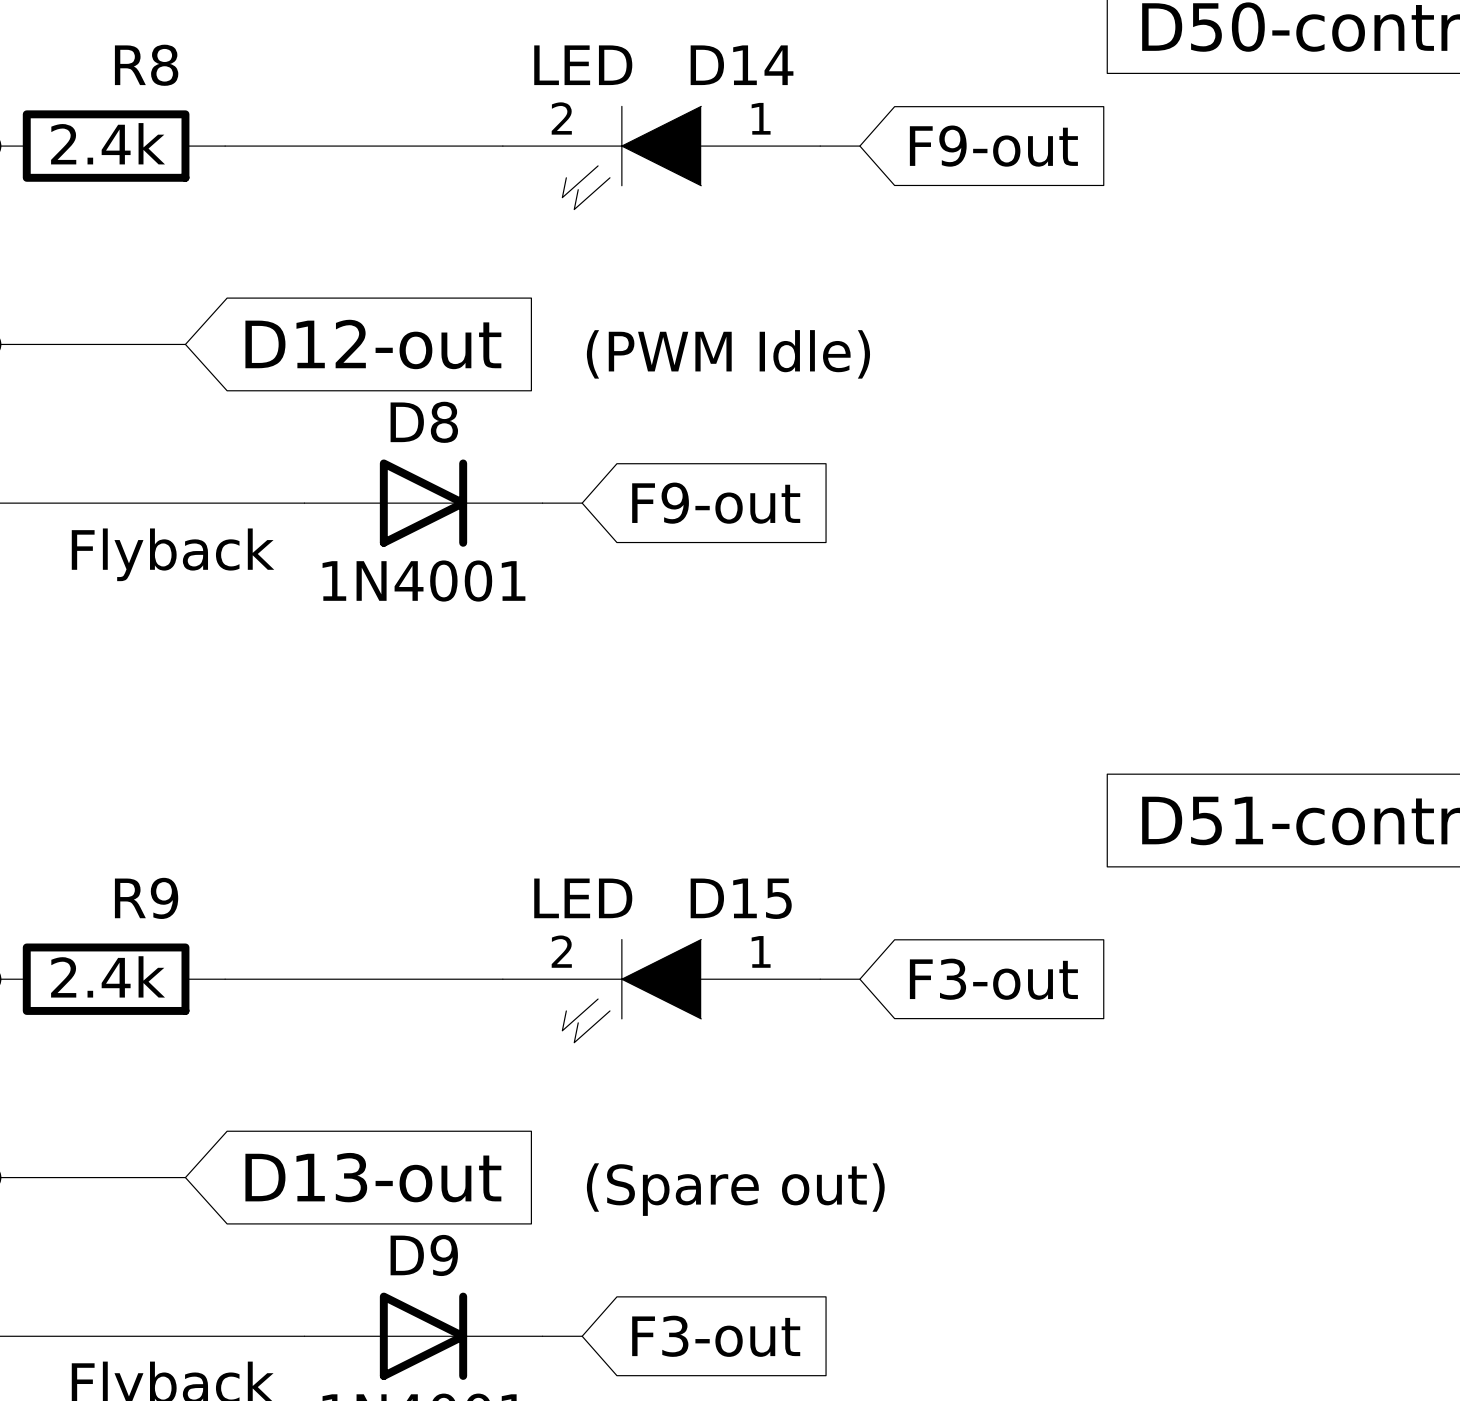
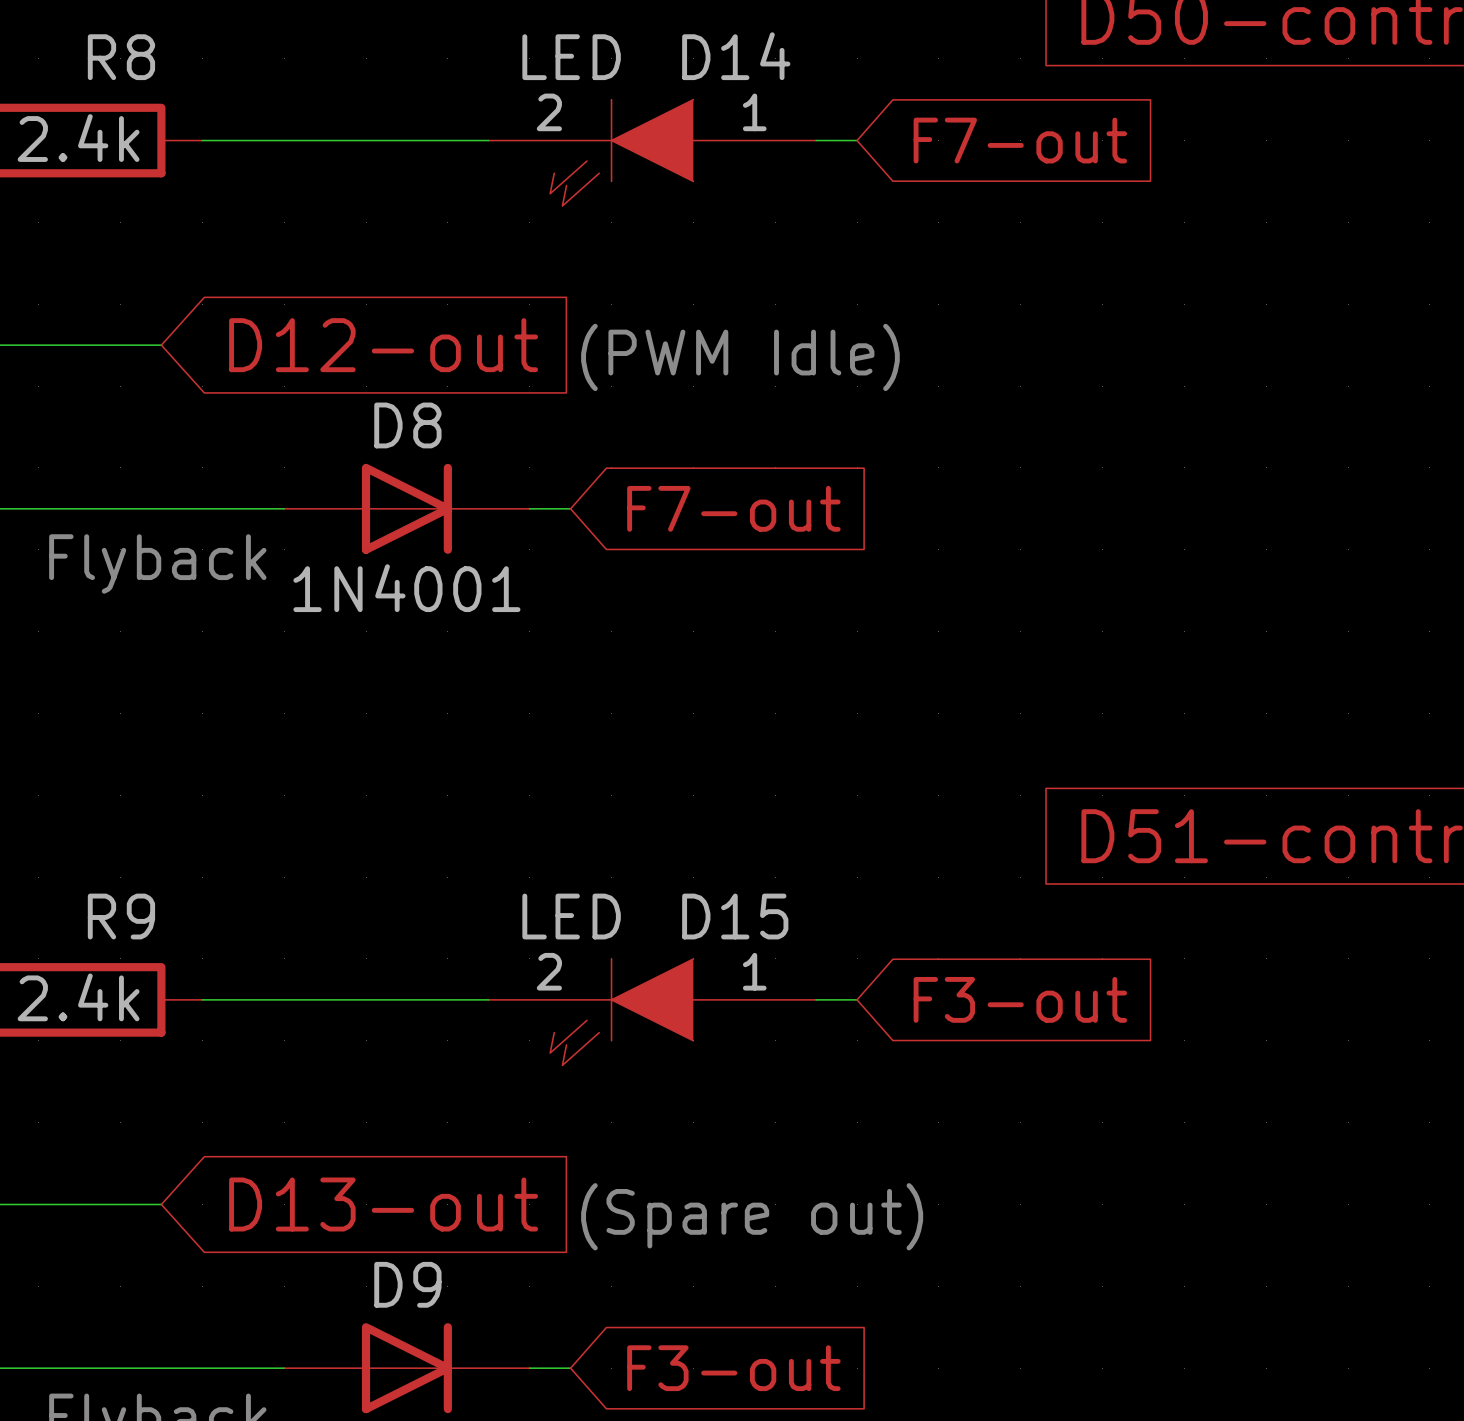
global label: F9-out (993, 146) -> F7-out (1020, 140)
global label: F9-out (716, 503) -> F7-out (733, 508)

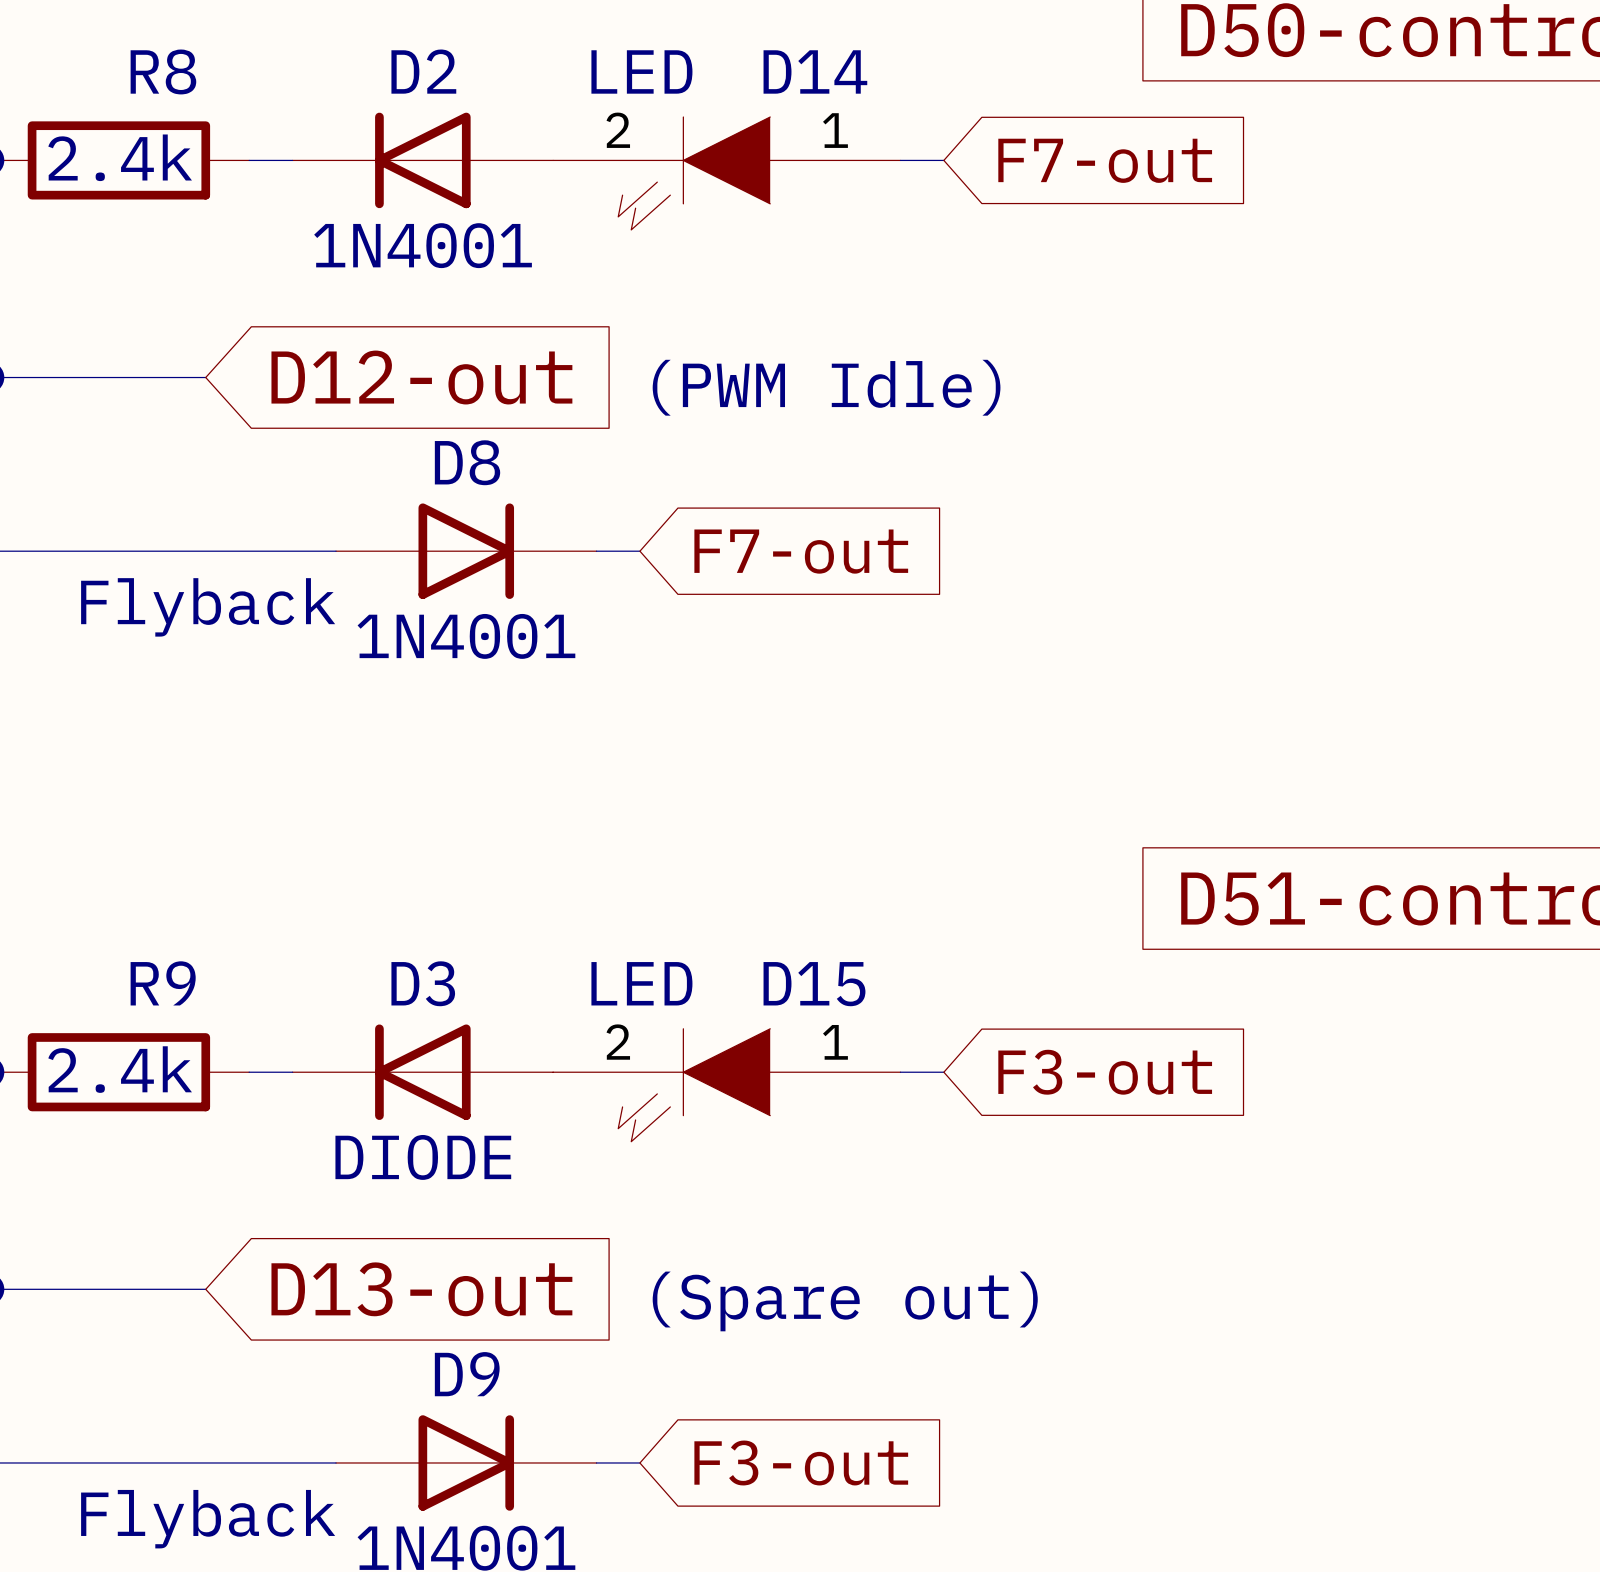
D2: none -> 1N4001 (422, 160)
D3: none -> DIODE (422, 1072)

